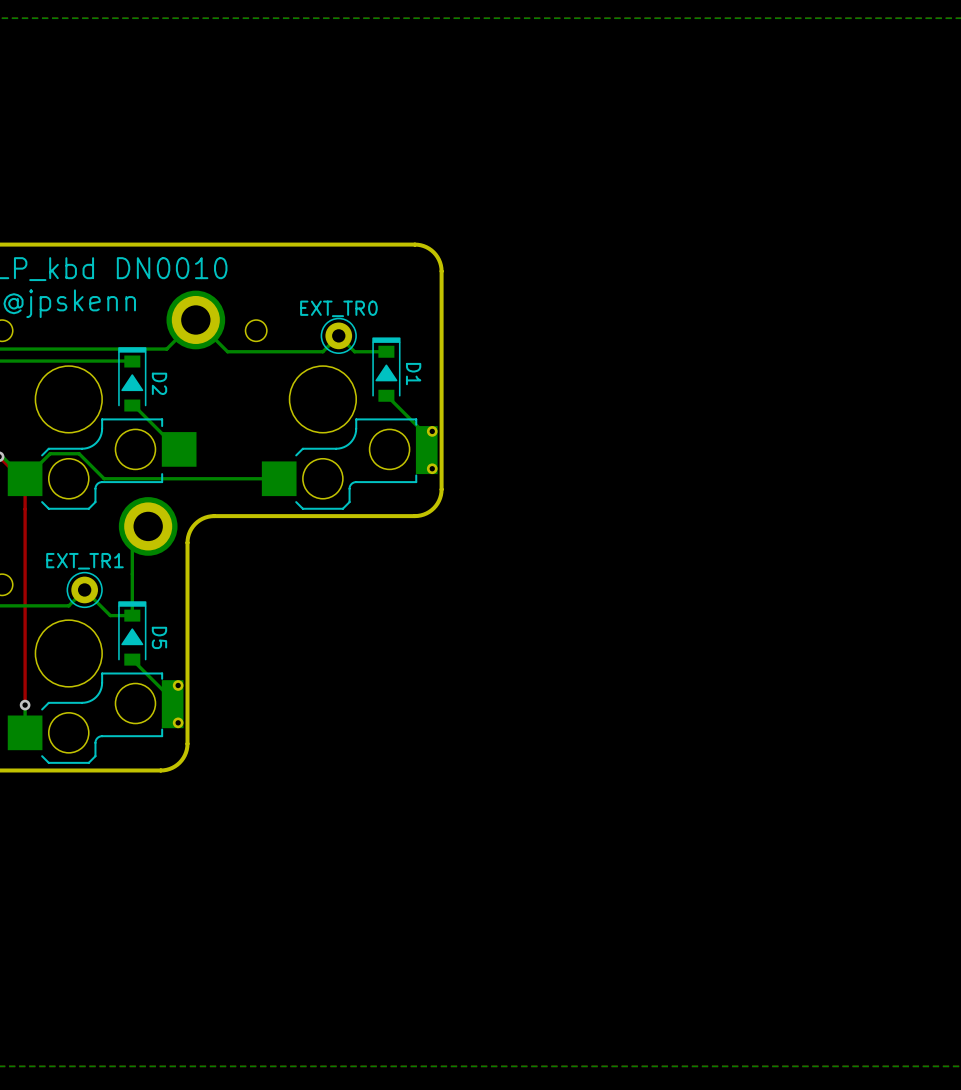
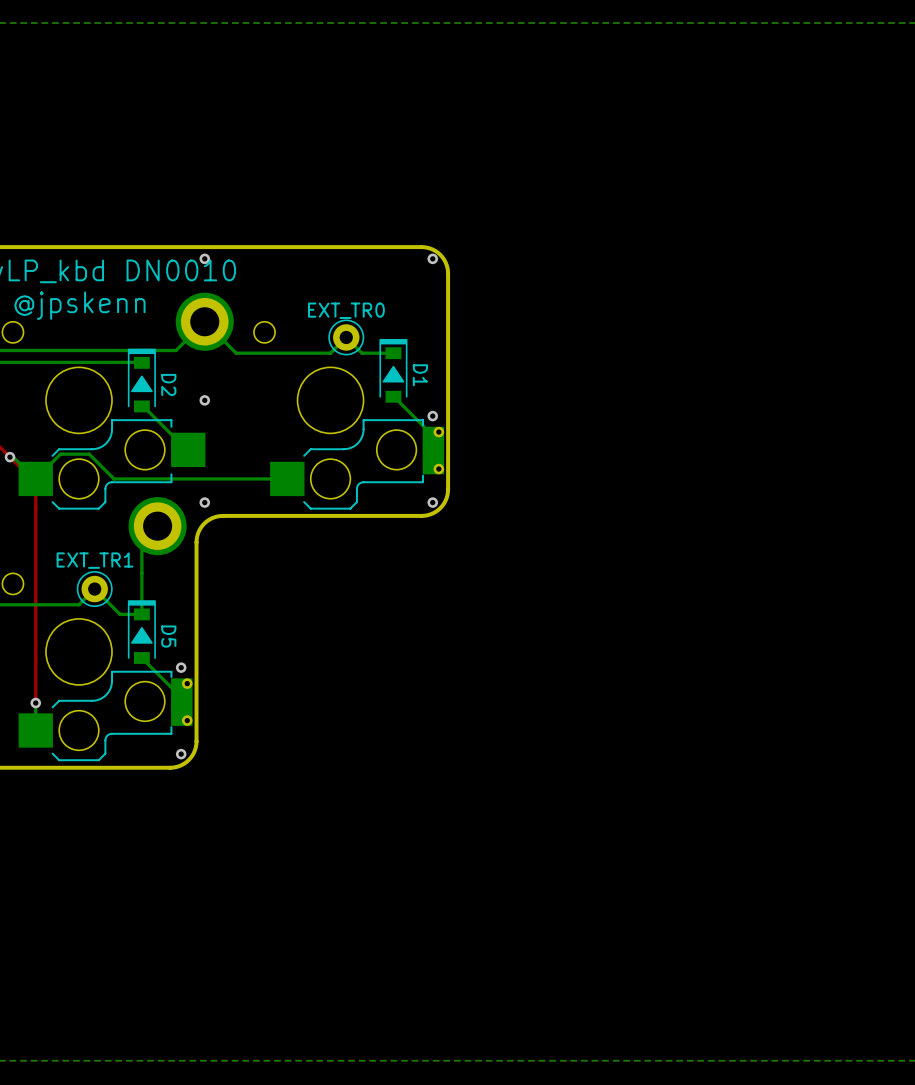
via: none -> (204, 258)
via: none -> (432, 258)
via: none -> (204, 400)
via: none -> (432, 416)
via: none -> (204, 502)
via: none -> (432, 502)
via: none -> (181, 667)
via: none -> (181, 754)

